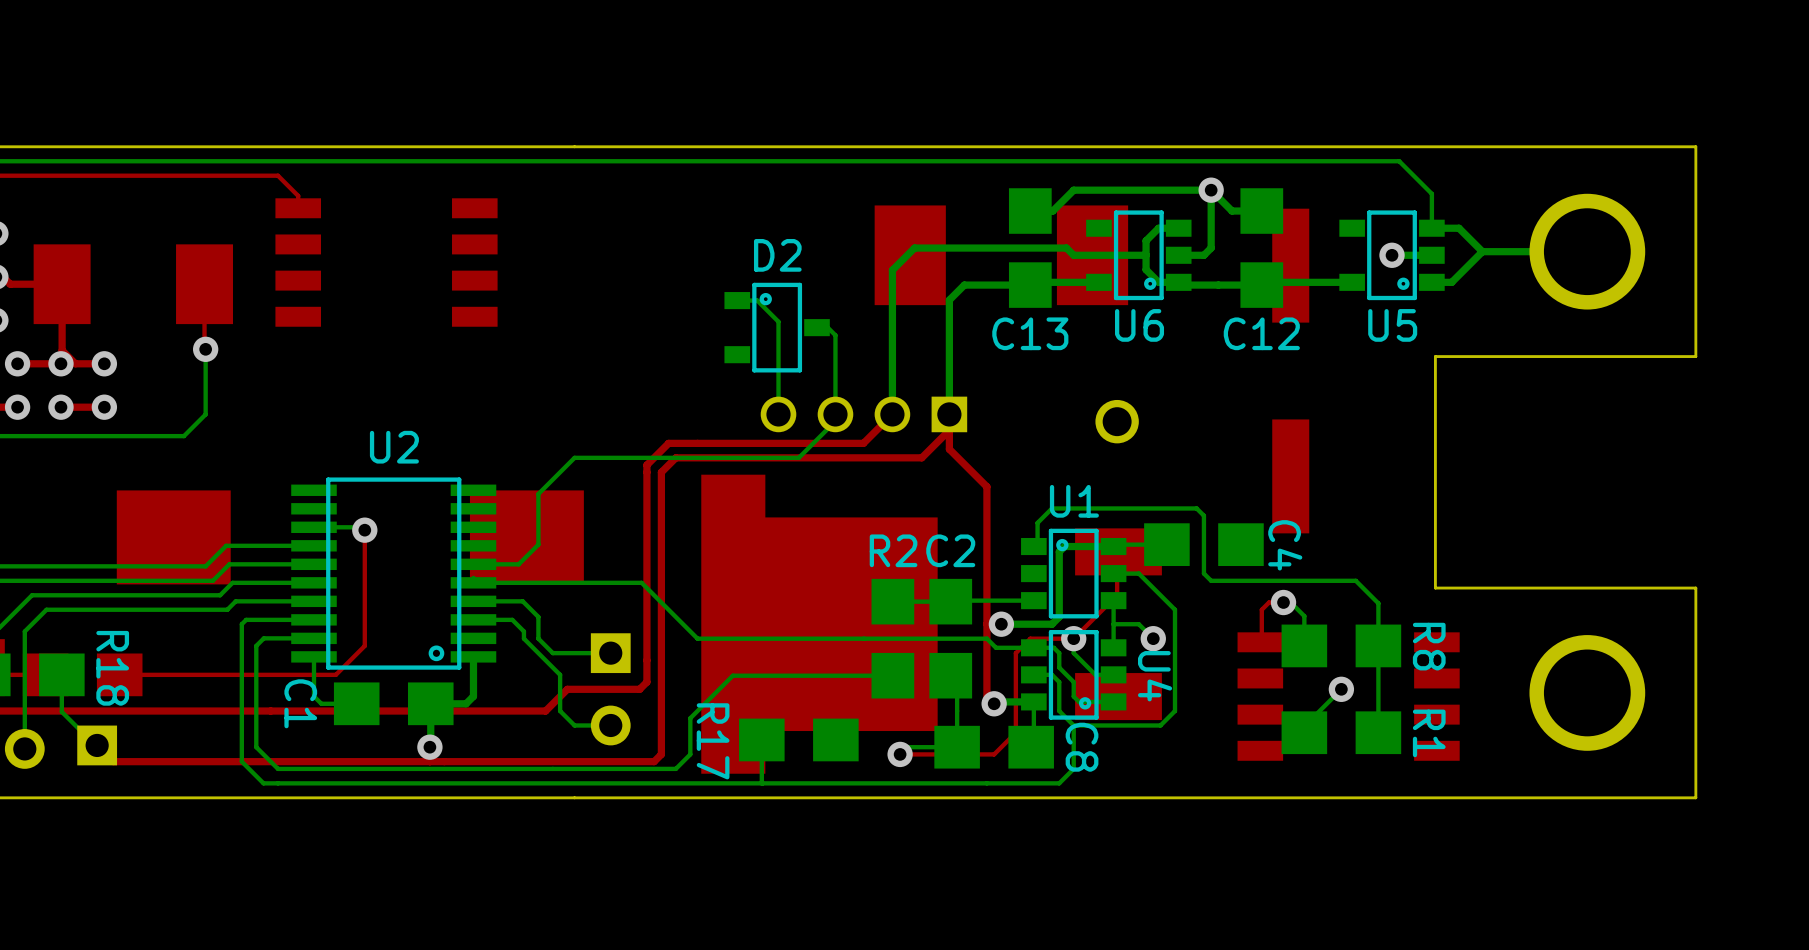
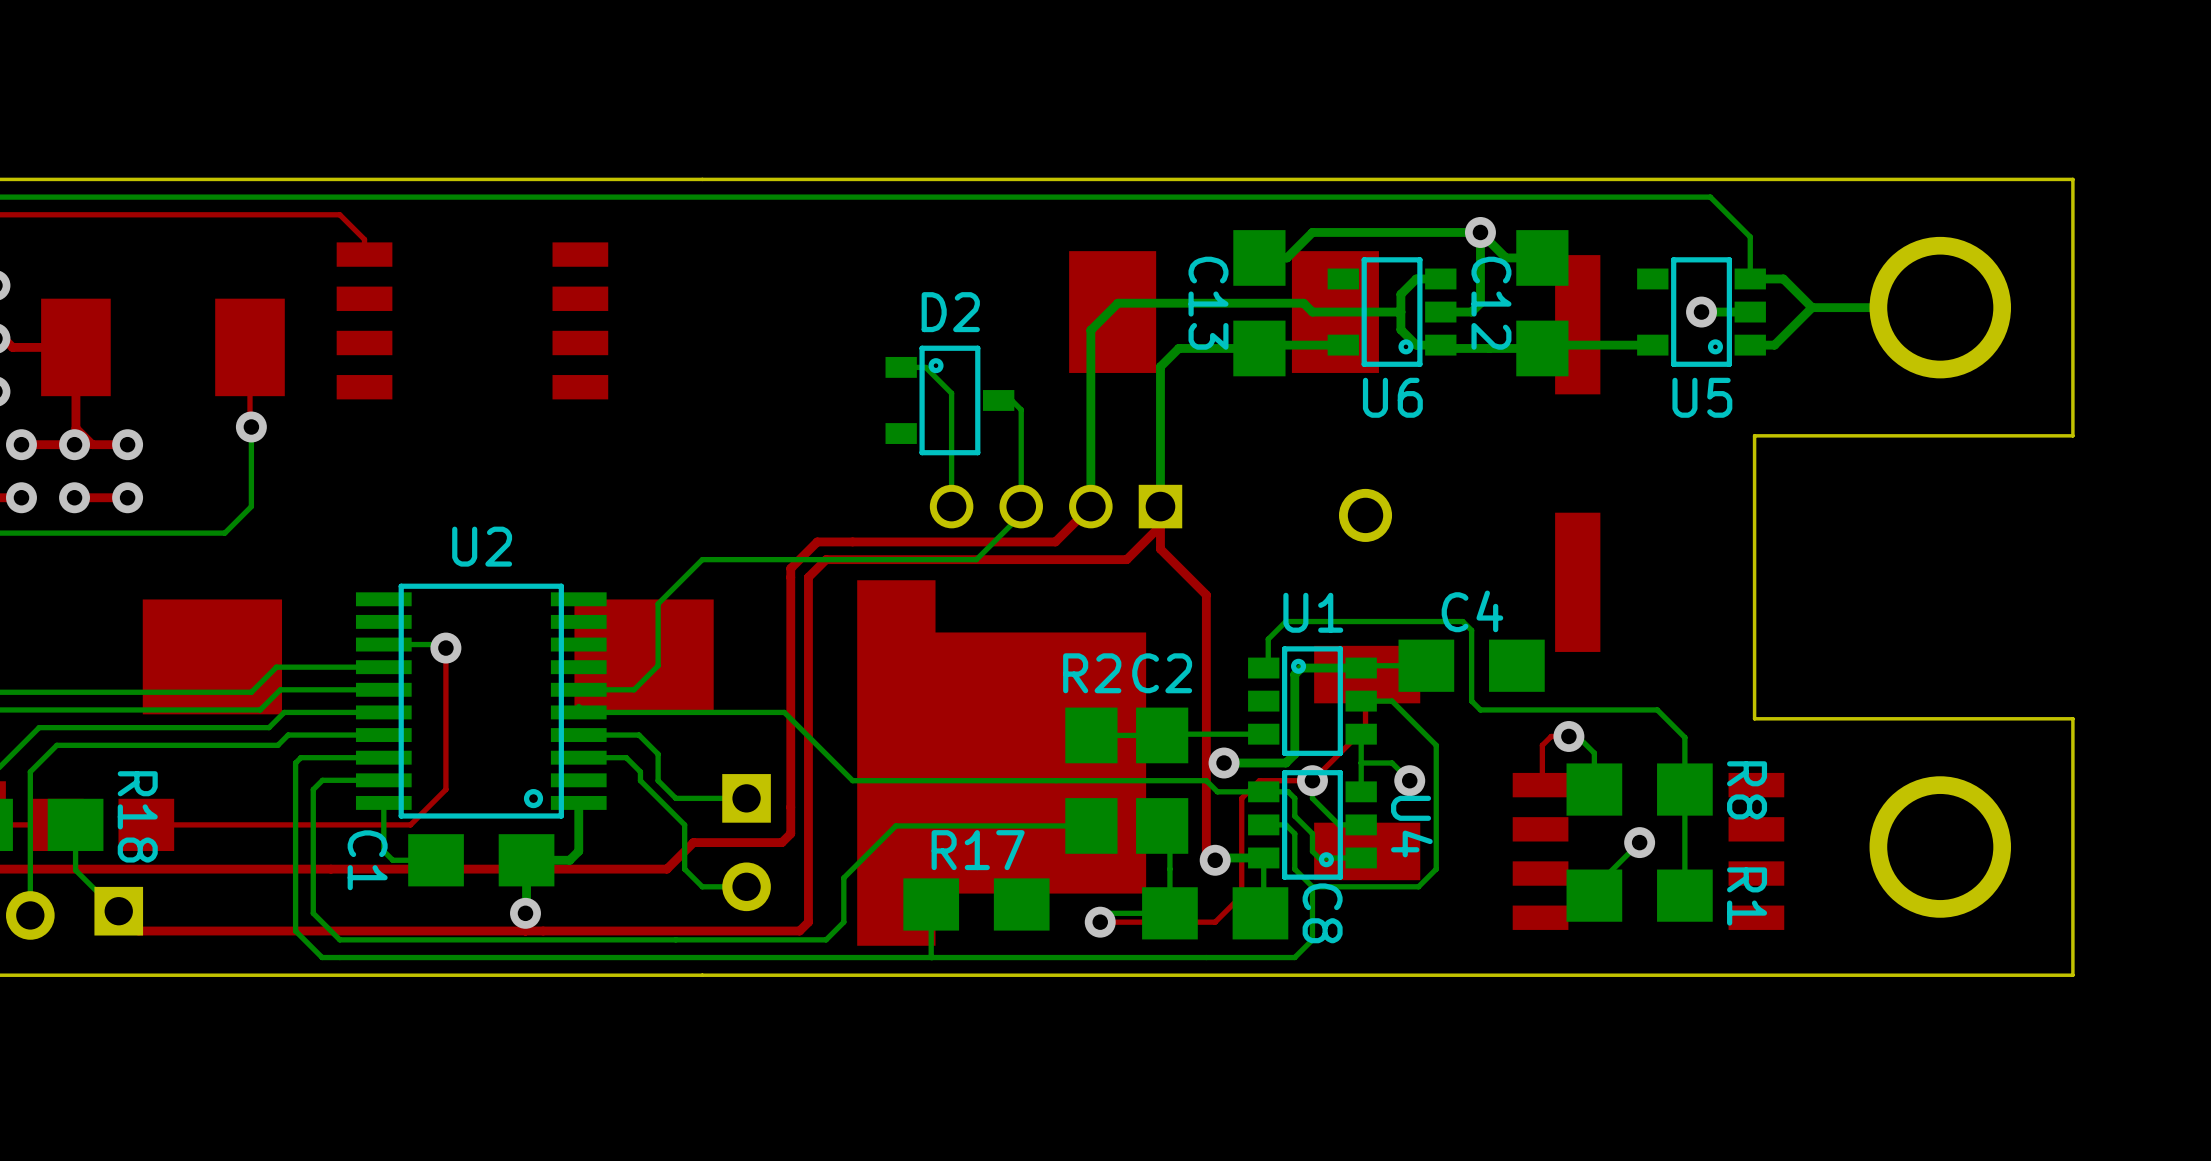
C13 name rotation: 0° (1030, 333) -> 90° clockwise (1208, 303)
C12 name rotation: 0° (1261, 333) -> 90° clockwise (1491, 303)
C4 name rotation: 0° (1285, 545) -> 90° counterclockwise (1472, 611)
C4 name position: C4 (1285, 545) -> C4 (1472, 611)
R17 name rotation: 0° (713, 741) -> 90° counterclockwise (978, 850)

